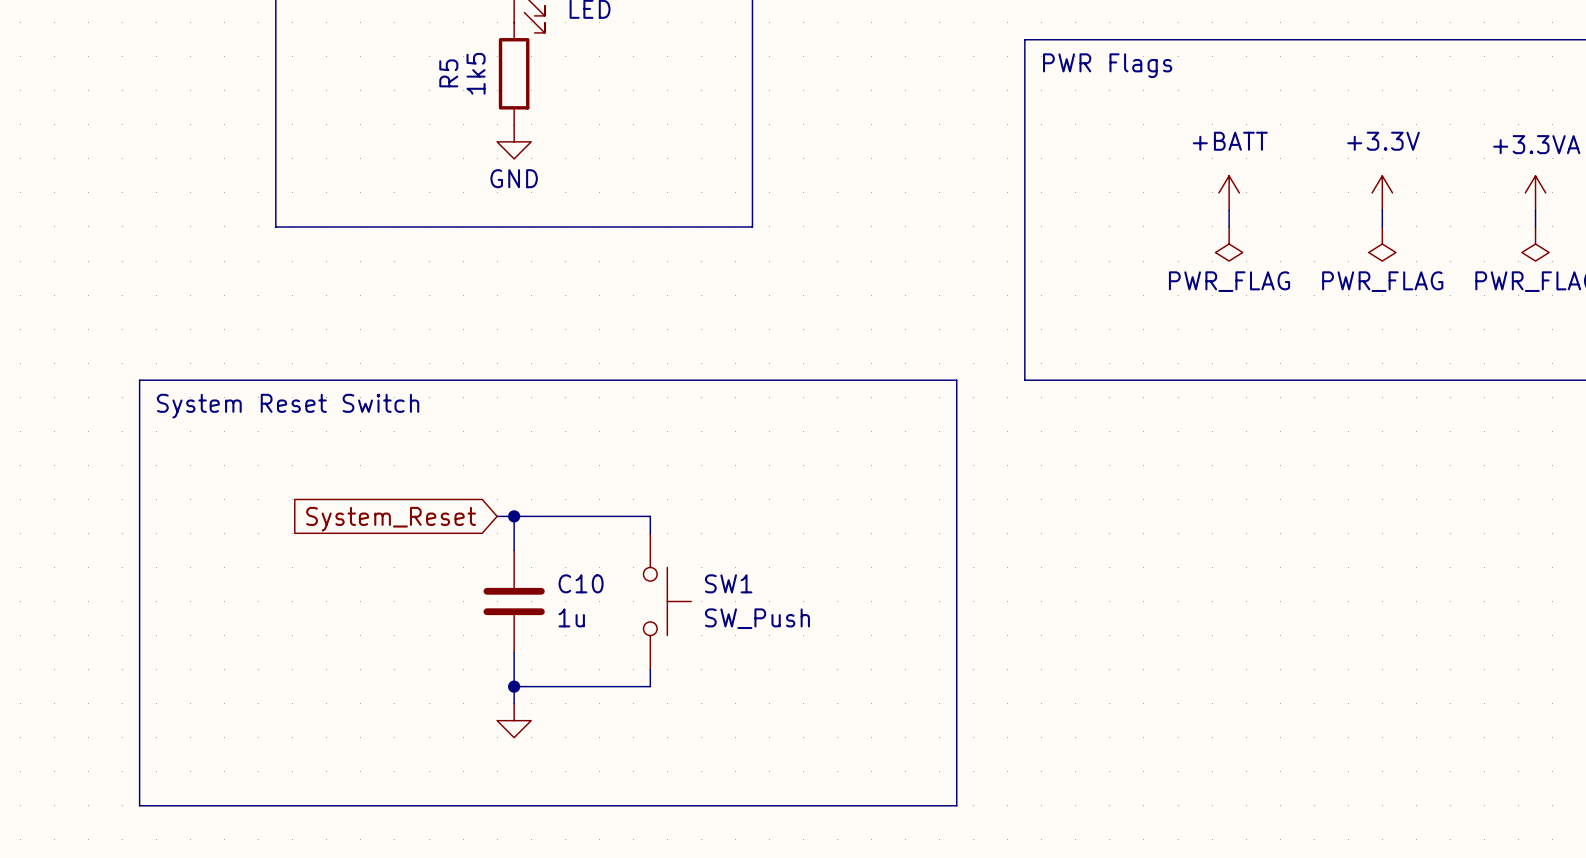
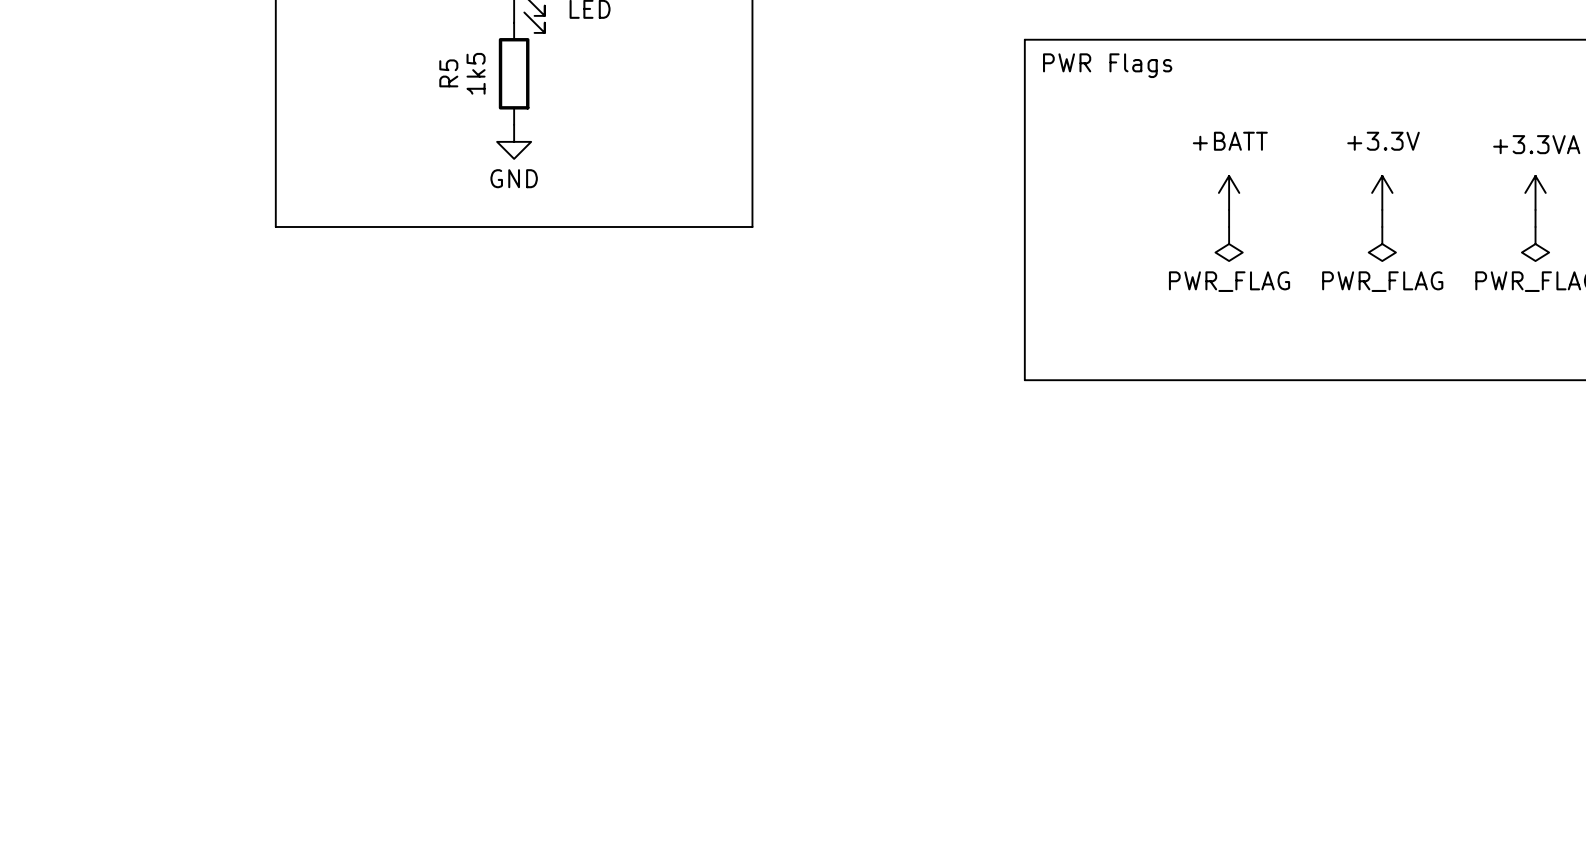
line: (139, 380) (956, 380) (956, 805) (139, 805) (139, 380) -> none
text: System Reset Switch (288, 406) -> none
wire: (497, 516) (650, 516) (650, 533) -> none
wire: (514, 516) (514, 550) -> none
junction: (514, 516) -> none
global label: System_Reset (391, 519) -> none
C10: 1u (514, 601) -> none
SW1: SW_Push (667, 601) -> none
wire: (514, 652) (514, 703) -> none
wire: (650, 669) (650, 686) (514, 686) -> none
junction: (514, 686) -> none
power symbol: (514, 720) -> none

